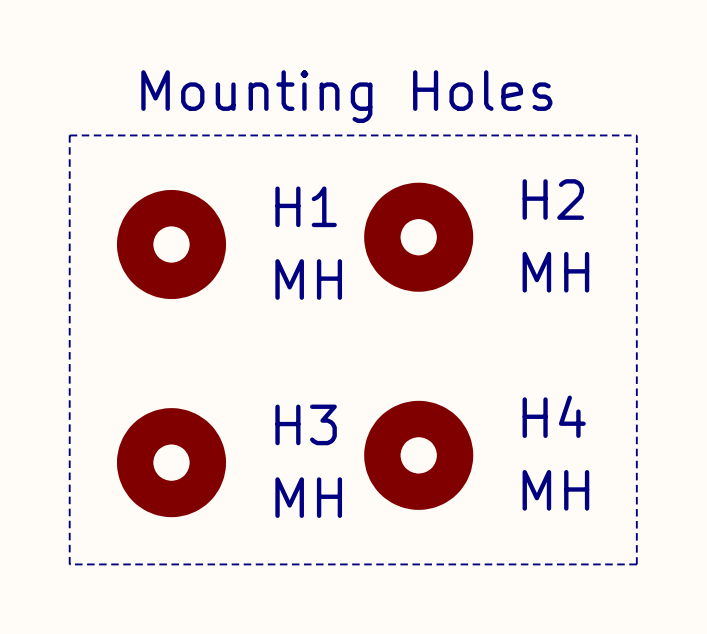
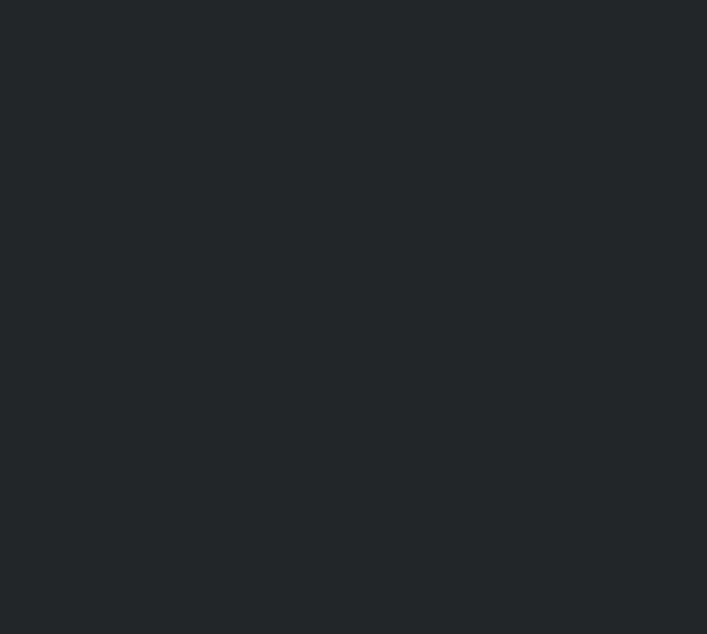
text: Mounting Holes (346, 96) -> none
line: (69, 135) (636, 135) (636, 564) (69, 564) (69, 135) -> none
H2: MH (418, 237) -> none
H1: MH (171, 244) -> none
H4: MH (418, 455) -> none
H3: MH (171, 462) -> none

